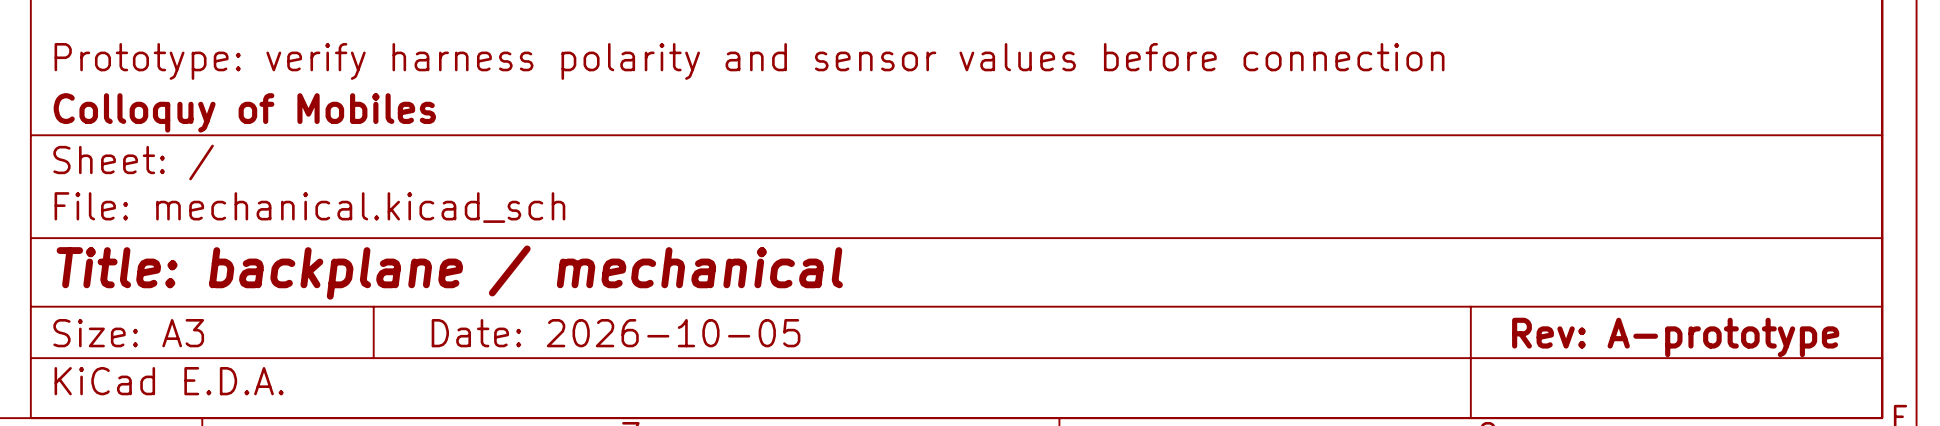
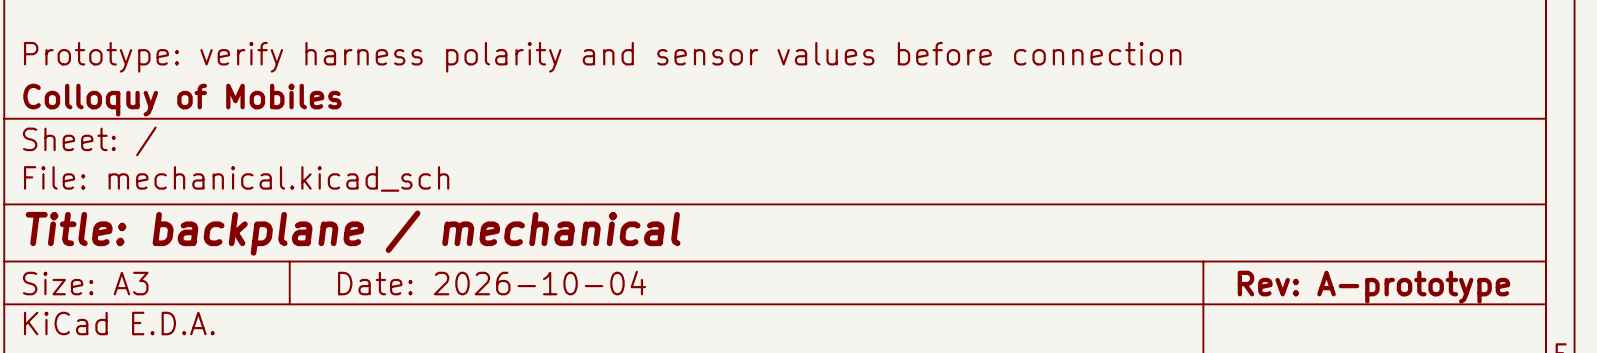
title block: Date: 2026-10-05 (616, 333) -> Date: 2026-10-04 (492, 283)

